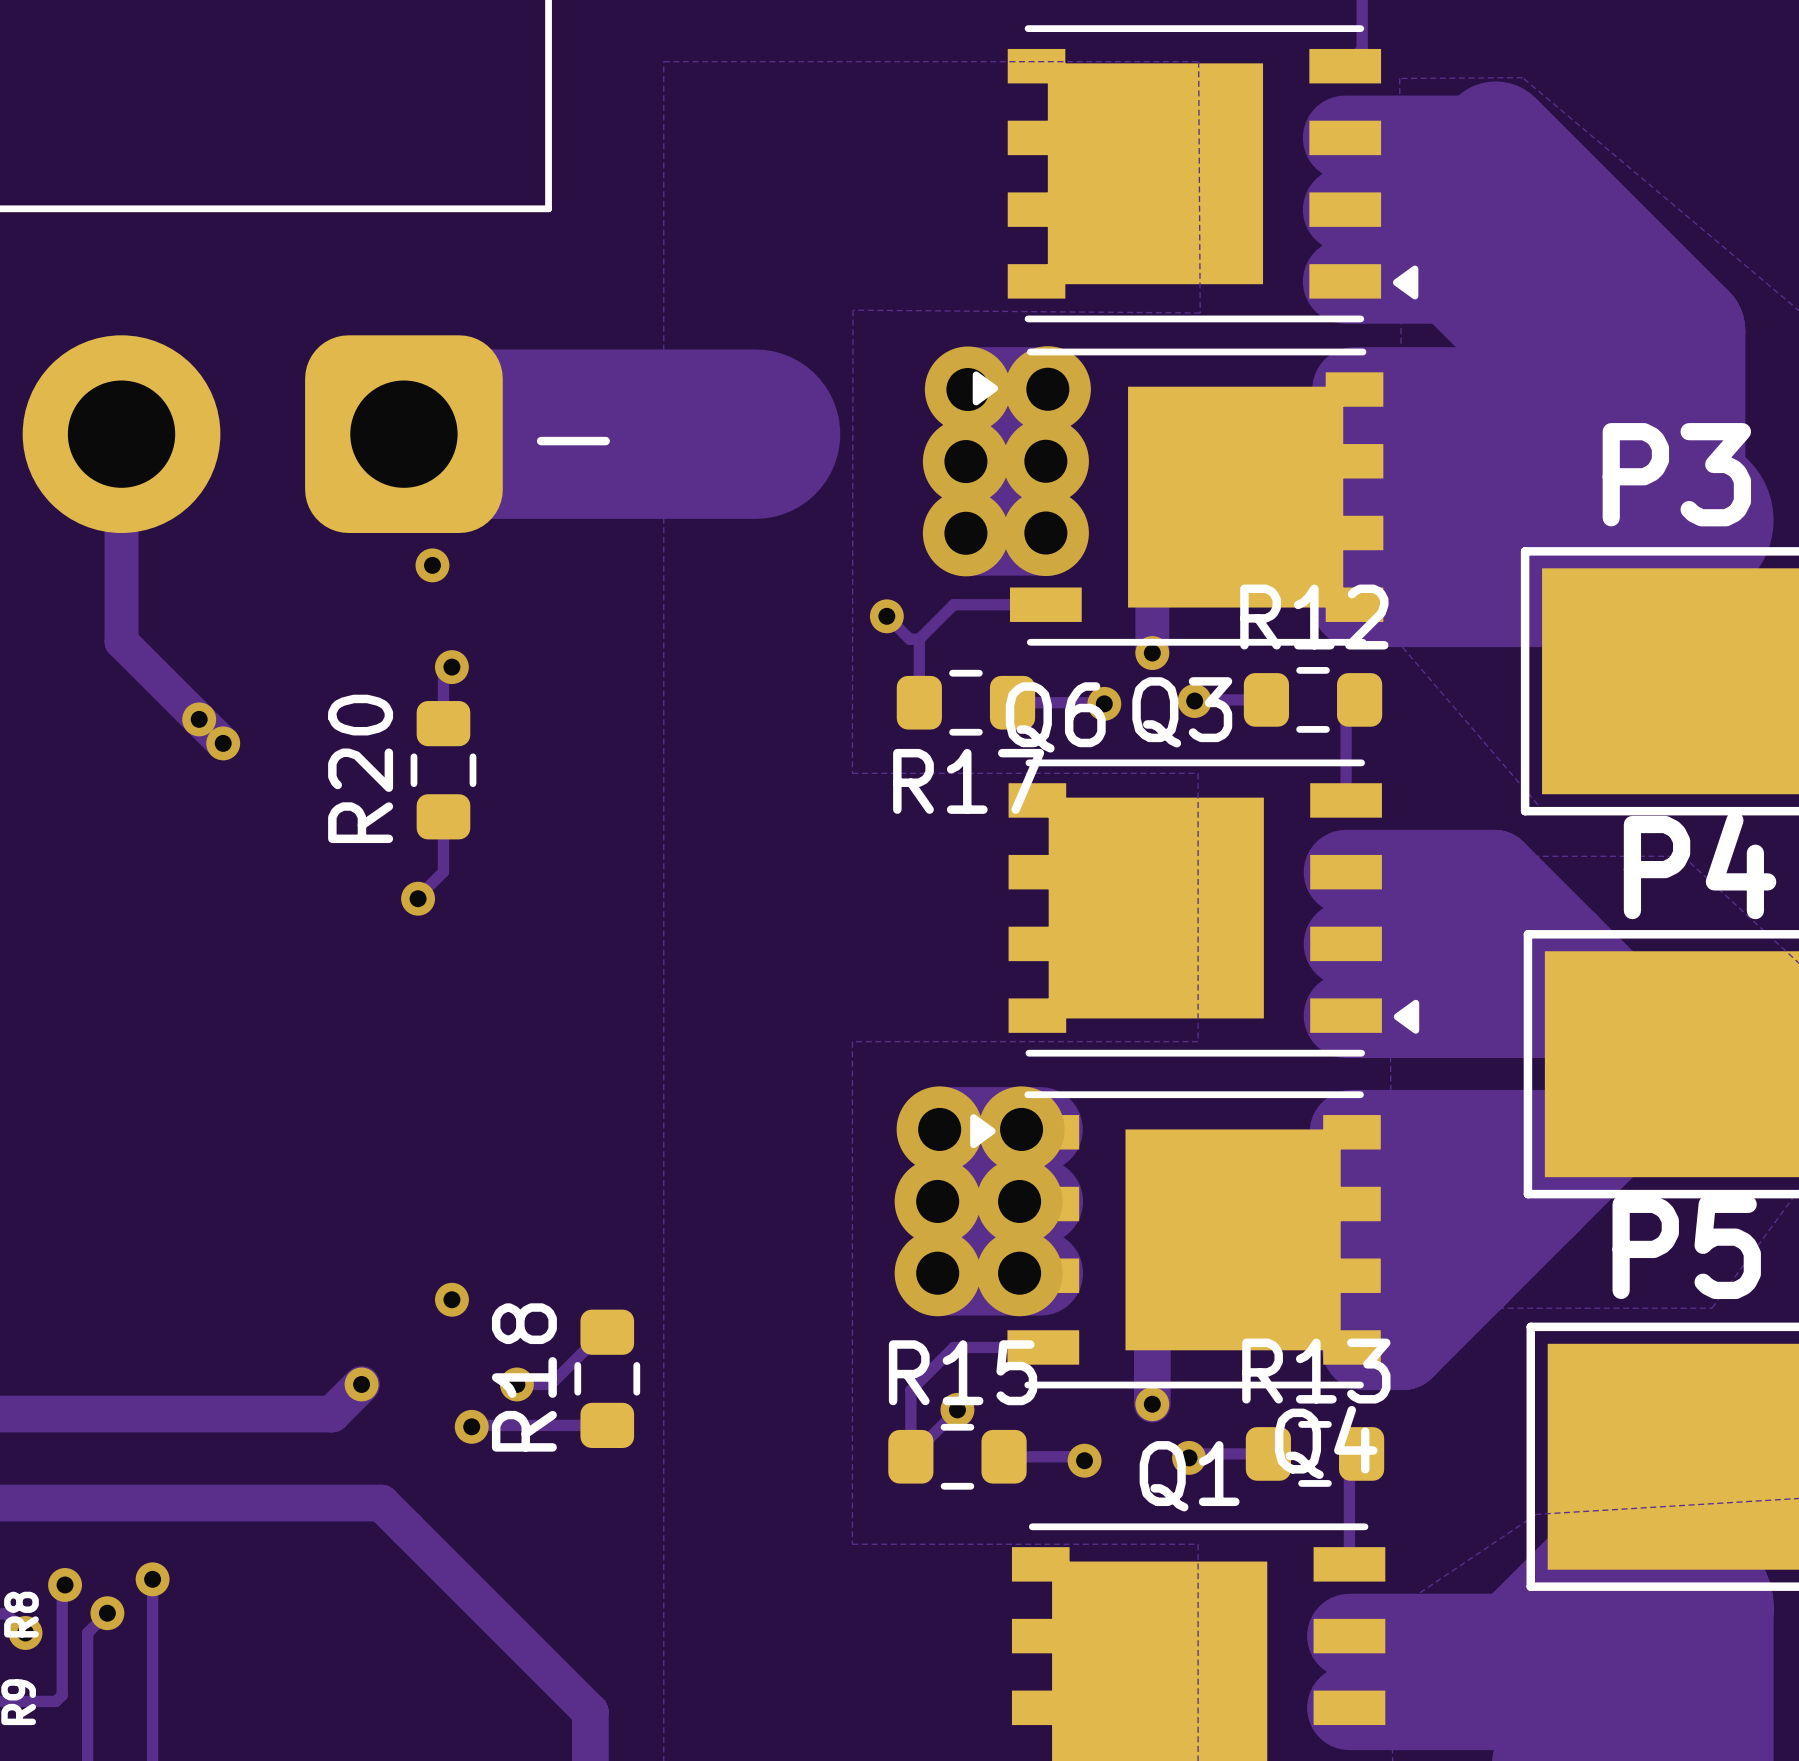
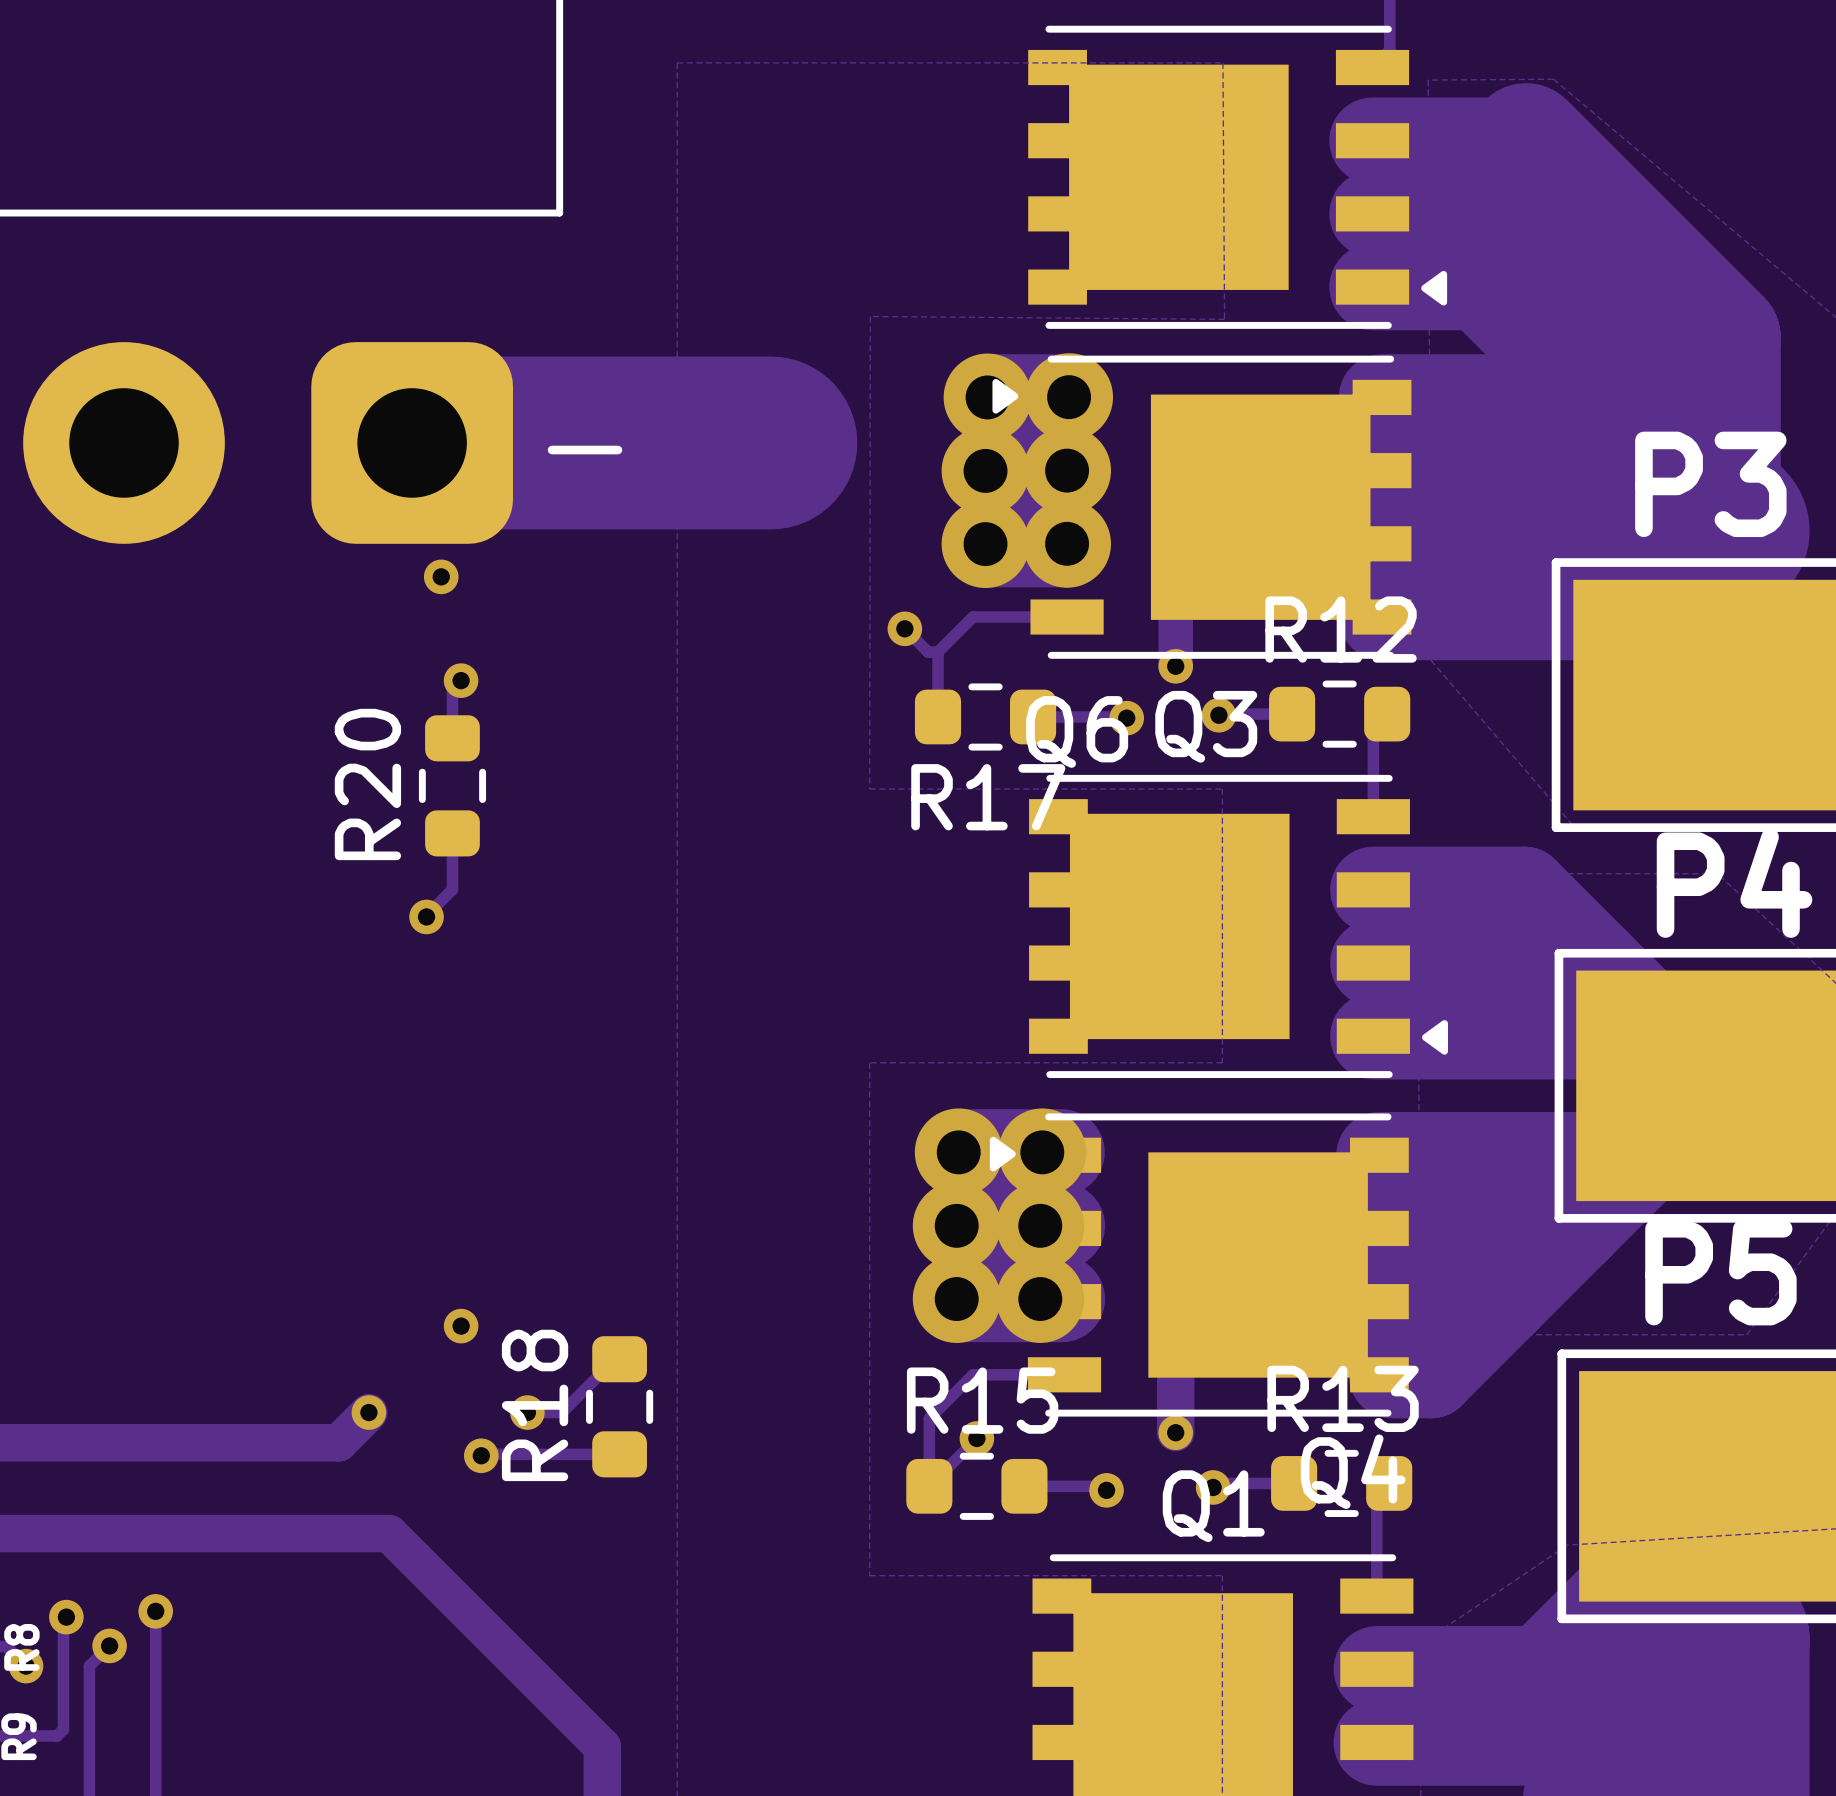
track: (121, 434) (121, 641) (223, 743) -> none
via: (199, 719) -> none
via: (223, 743) -> none

